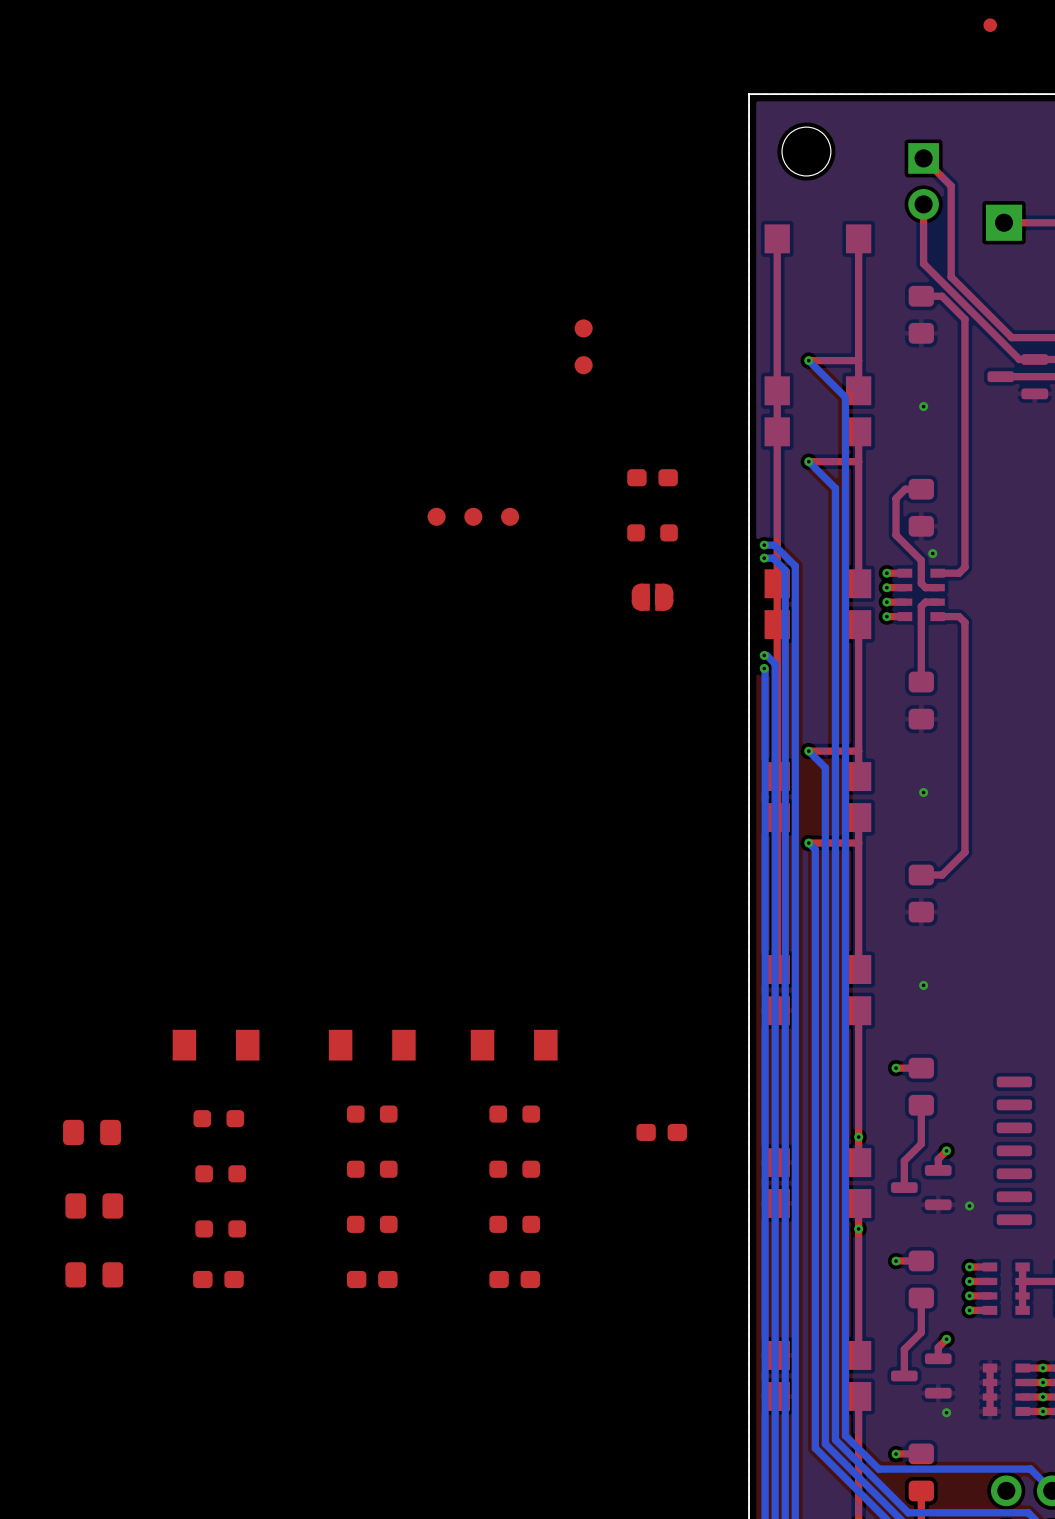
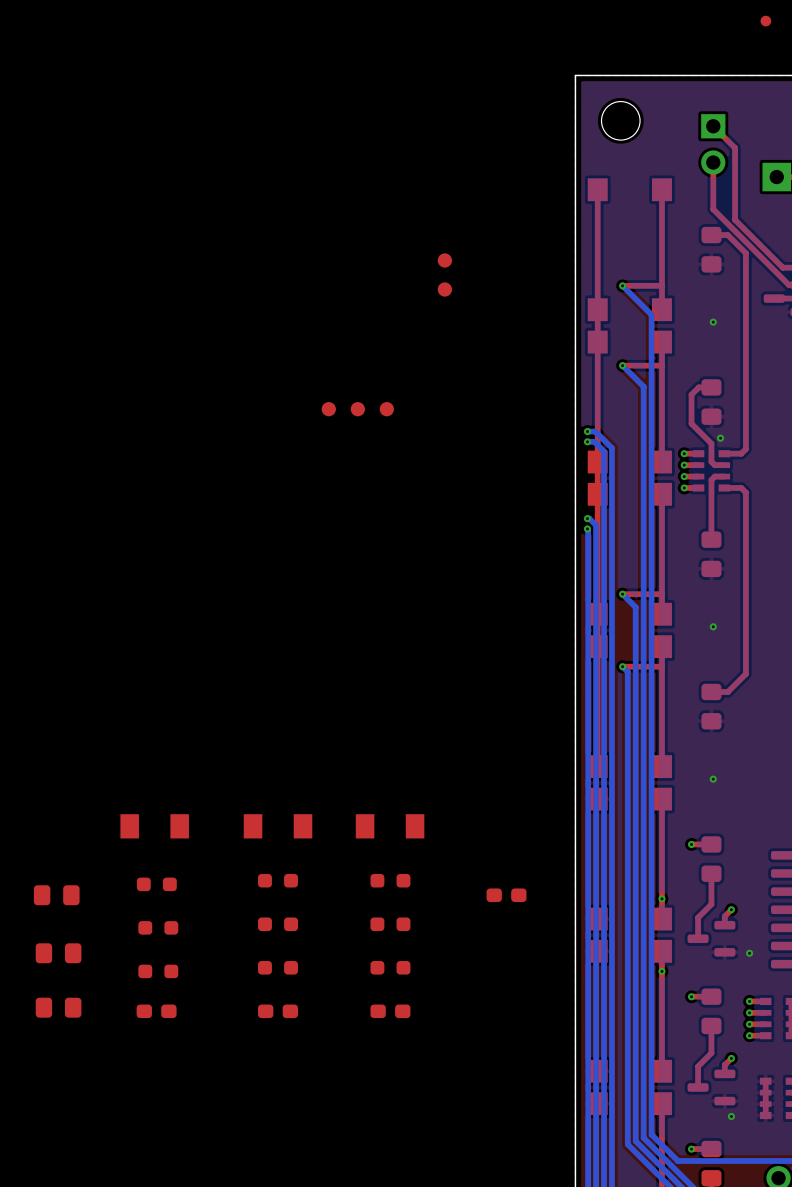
part: (652, 477) -> none
part: (652, 532) -> none
part: (652, 597) -> none

